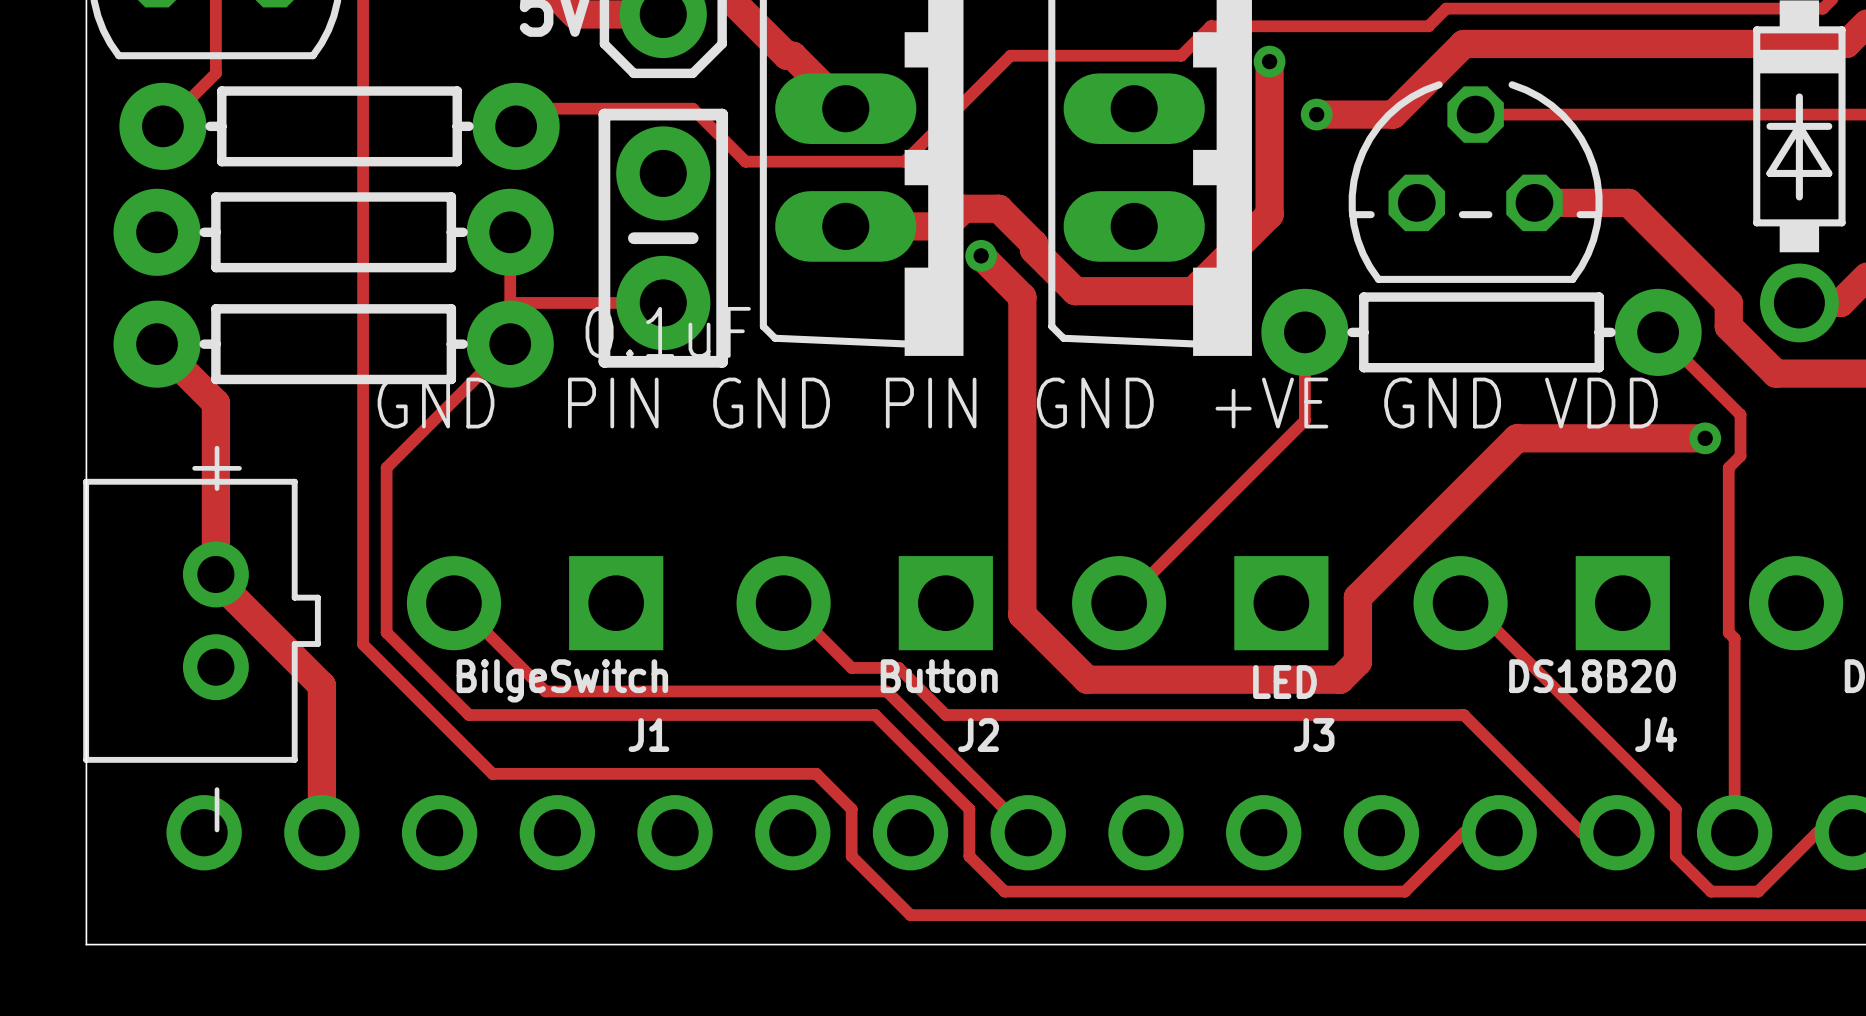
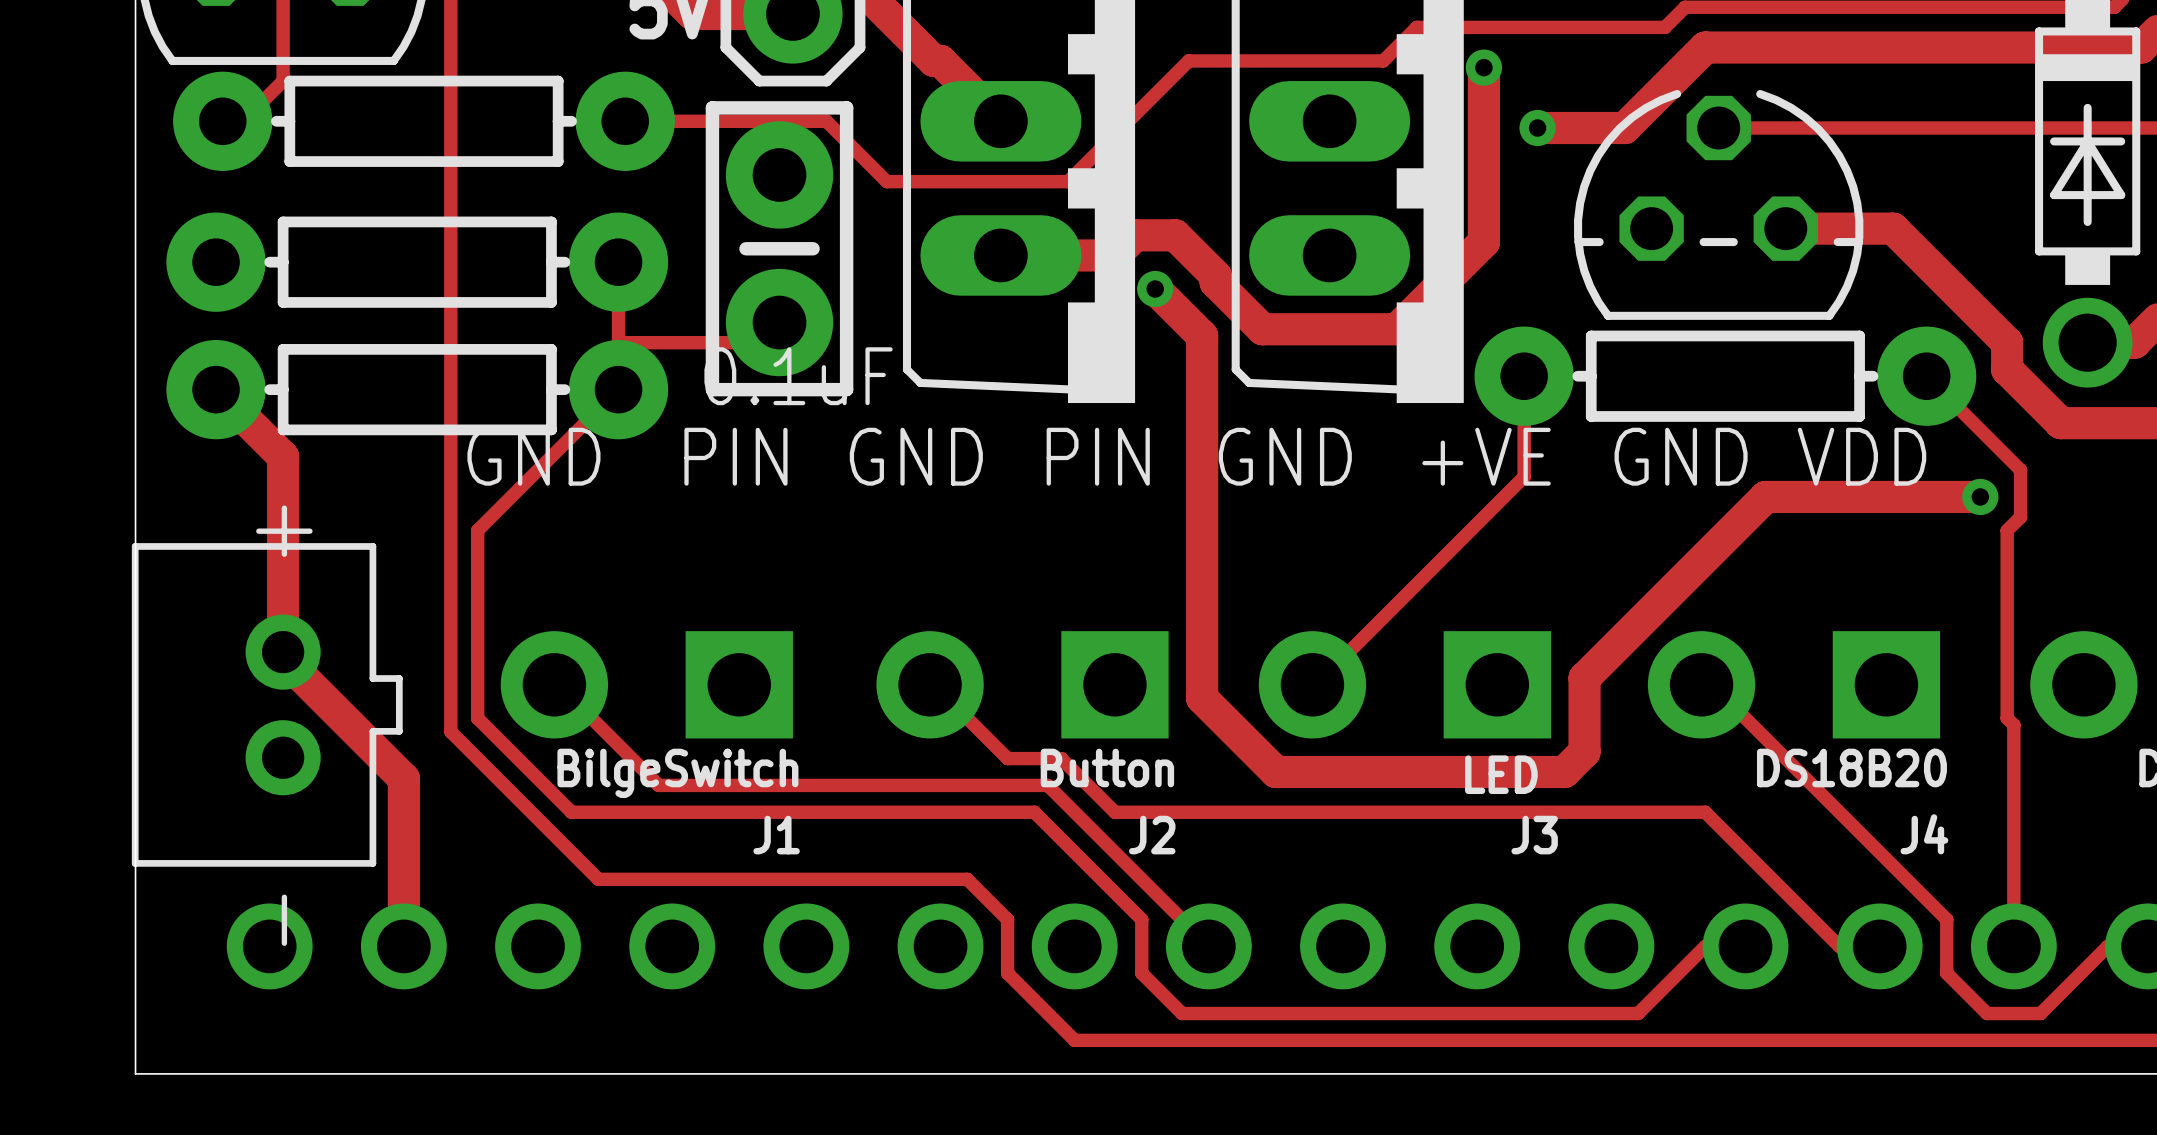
part position: (339, 126) -> (423, 121)
part position: (663, 238) -> (779, 248)

